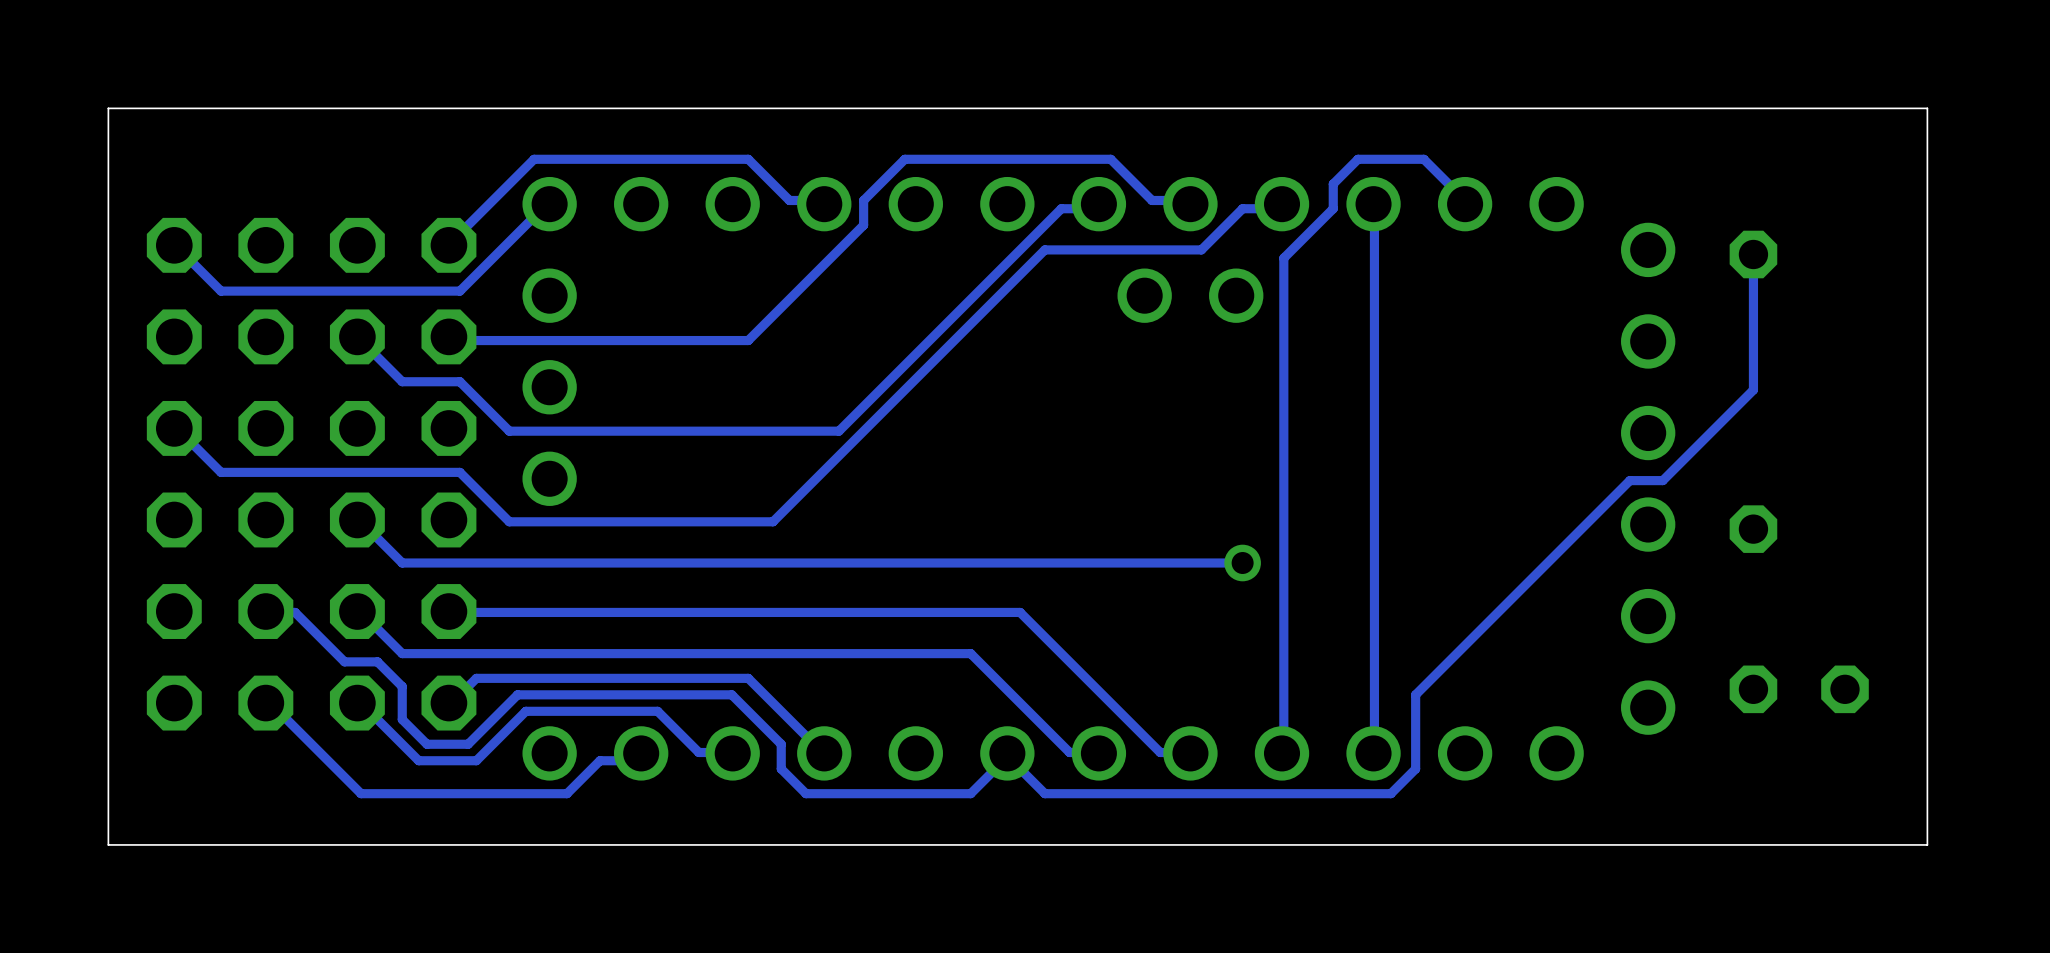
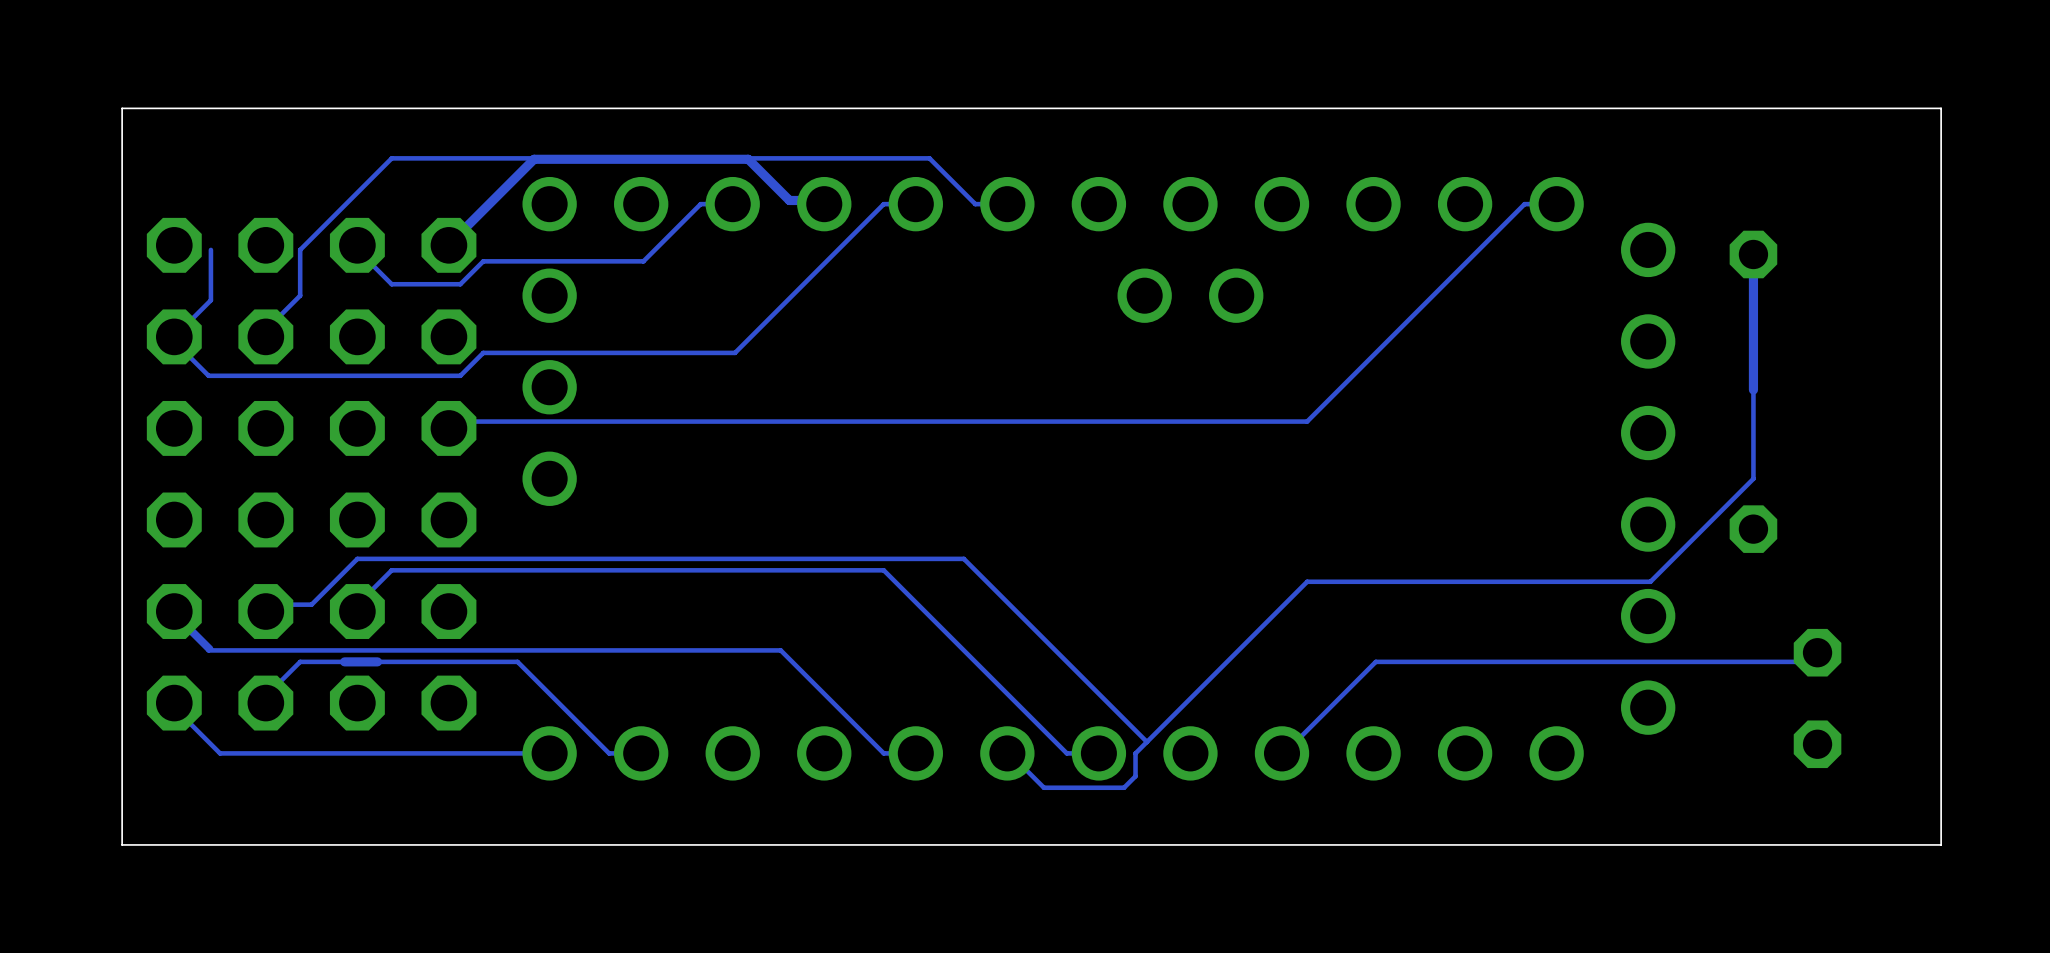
board edge: (122, 108) (108, 108) (108, 844) (122, 844) -> (122, 108) (122, 844)
board edge: (1927, 108) (1927, 844) -> (1927, 108) (1941, 108) (1941, 844) (1927, 844)
track: (549, 204) (542, 208) (459, 291) (220, 291) (174, 245) -> none
track: none -> (732, 204) (700, 204) (643, 261) (483, 261) (460, 284) (391, 284) (357, 249) (357, 245)
track: none -> (915, 204) (883, 204) (735, 352) (483, 352) (460, 375) (208, 375) (174, 341) (174, 336) (210, 300) (210, 249)
track: none -> (1007, 204) (975, 204) (929, 158) (391, 158) (300, 249) (300, 295) (265, 330) (265, 336)
track: (1098, 204) (1094, 208) (1061, 208) (838, 431) (509, 431) (459, 381) (402, 381) (357, 336) -> none
track: (1190, 204) (1184, 200) (1152, 200) (1110, 159) (904, 159) (863, 200) (863, 225) (748, 340) (451, 340) (448, 336) -> none
track: (1281, 204) (1275, 208) (1242, 208) (1201, 249) (1044, 249) (773, 521) (509, 521) (459, 472) (220, 472) (179, 431) (174, 428) -> none
track: (1373, 204) (1373, 753) -> none
track: (1465, 204) (1465, 200) (1423, 159) (1357, 159) (1333, 184) (1333, 208) (1283, 258) (1283, 752) (1281, 753) -> (1817, 652) (1810, 661) (1375, 661) (1284, 753) (1281, 753)
track: none -> (1556, 204) (1524, 204) (1307, 421) (448, 421) (448, 428)
track: (1753, 389) (1662, 480) (1629, 480) (1415, 694) (1415, 768) (1390, 793) (1044, 793) (1011, 760) (1007, 753) (1003, 760) (970, 793) (805, 793) (781, 768) (781, 744) (731, 694) (517, 694) (468, 744) (426, 744) (402, 719) (402, 686) (377, 661) -> (1753, 389) (1753, 478) (1650, 581) (1307, 581) (1135, 753) (1135, 776) (1124, 787) (1043, 787) (1009, 753) (1007, 753)
track: (357, 519) (402, 563) (1242, 563) -> none
via: (1242, 563) -> none
track: (265, 611) (295, 612) (344, 661) -> (265, 703) (265, 696) (300, 661) (344, 661)
track: none -> (265, 611) (265, 604) (311, 604) (357, 558) (963, 558) (1146, 741)
track: (357, 611) (361, 612) (402, 653) (970, 653) (1069, 752) (1098, 753) -> (357, 611) (357, 604) (391, 570) (883, 570) (1066, 753) (1098, 753)
track: (448, 611) (1020, 612) (1160, 752) (1190, 753) -> none
track: none -> (210, 648) (174, 611) (174, 616) (208, 650) (780, 650) (883, 753) (915, 753)
part rotation: 0° (1799, 689) -> 90° clockwise (1817, 698)
track: none -> (174, 703) (174, 707) (220, 753) (549, 753)
track: (265, 703) (270, 703) (361, 793) (567, 793) (599, 760) (641, 760) (641, 753) -> (377, 661) (517, 661) (609, 753) (641, 753)
track: (357, 703) (361, 703) (418, 760) (476, 760) (525, 711) (657, 711) (698, 752) (732, 753) -> none
track: (448, 703) (451, 703) (476, 678) (748, 678) (824, 753) -> none

